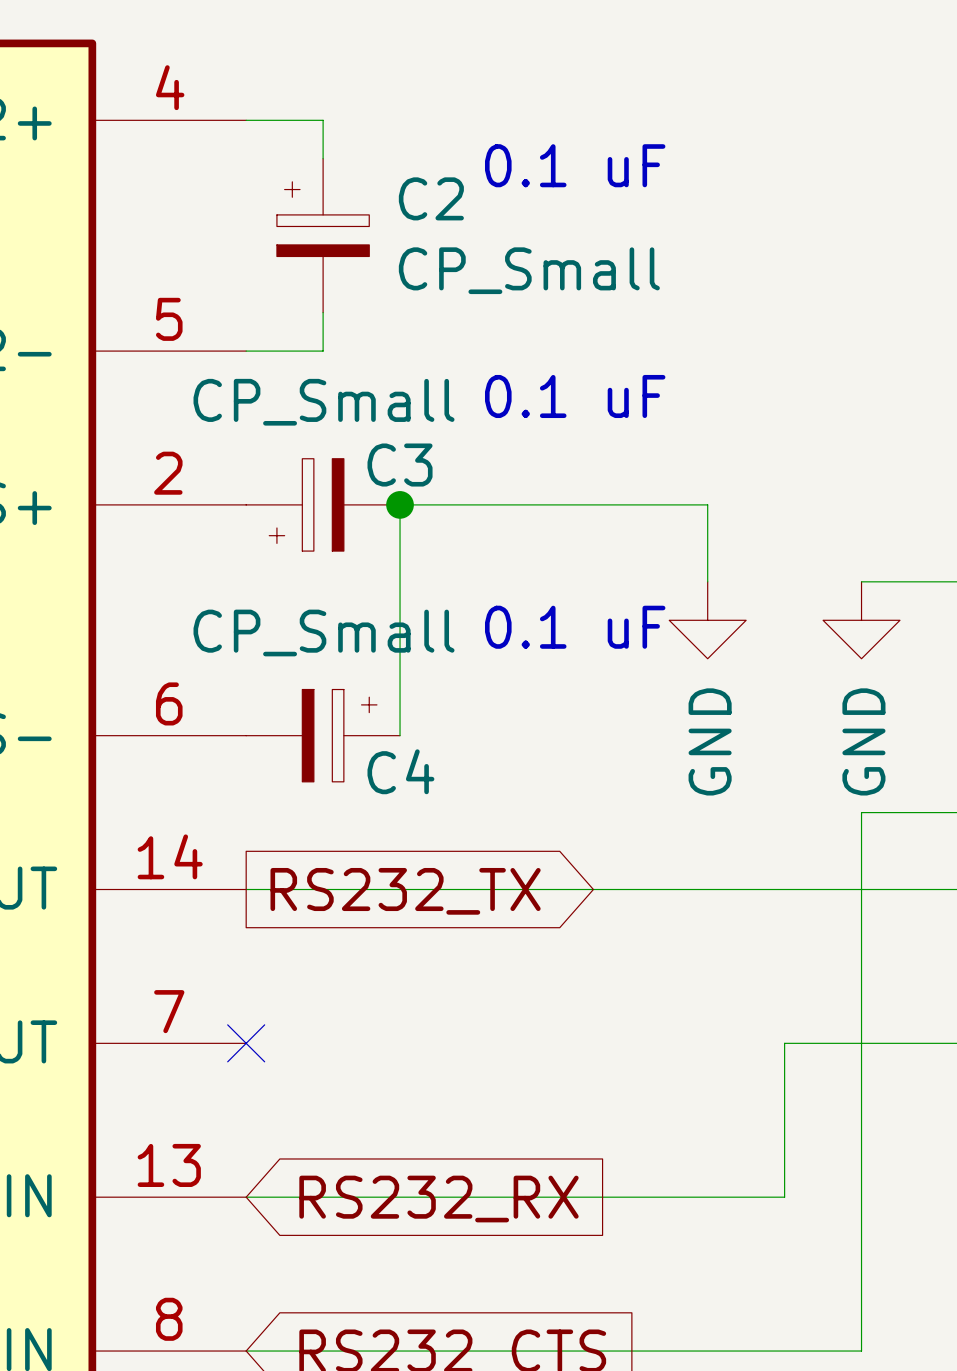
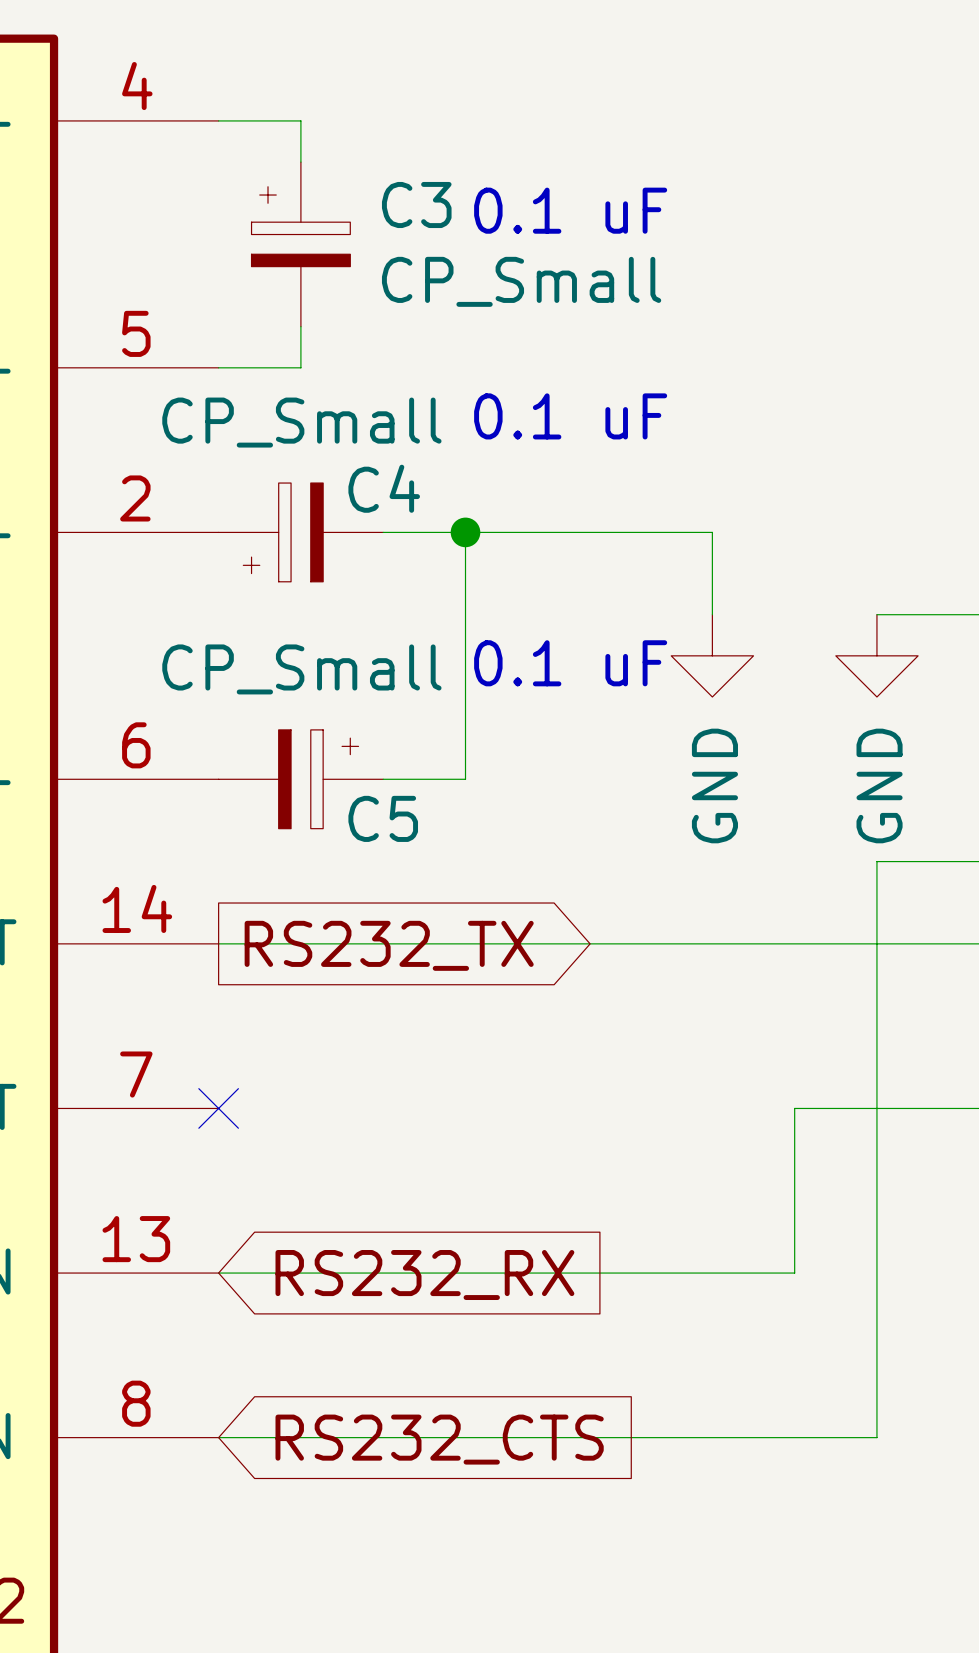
text position: 0.1 uF (575, 165) -> 0.1 uF (570, 210)
C2 name: C2 (431, 198) -> C3 (416, 205)
C3 name: C3 (400, 465) -> C4 (384, 488)
wire: (400, 504) (400, 735) -> (465, 532) (465, 779) (383, 779)
junction position: (400, 504) -> (465, 532)
C4 name: C4 (400, 771) -> C5 (383, 818)

